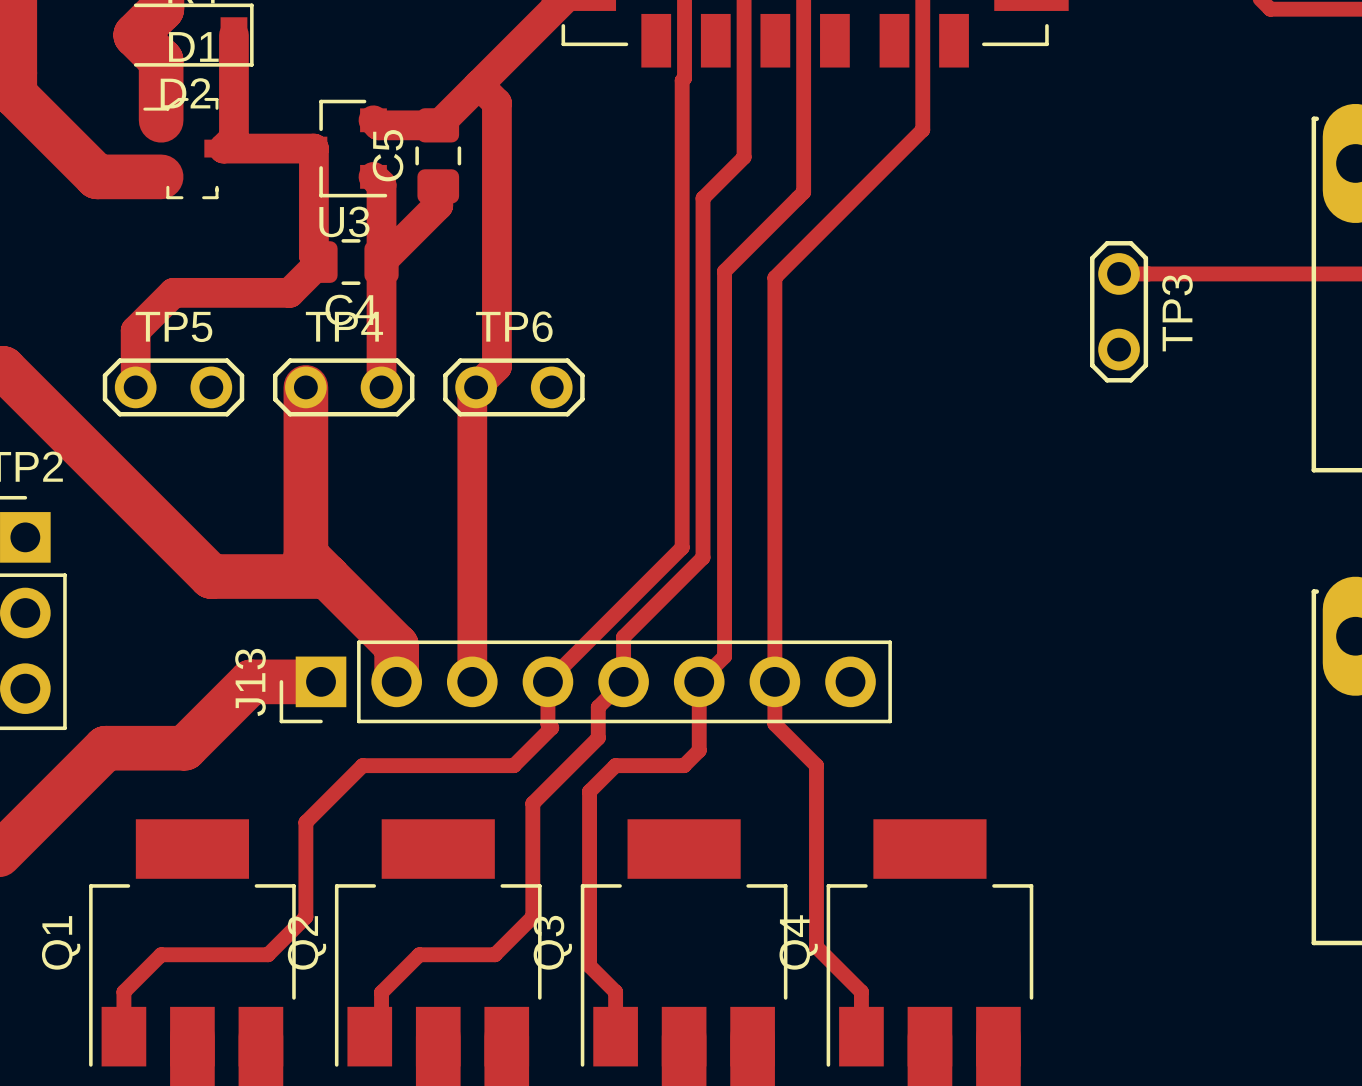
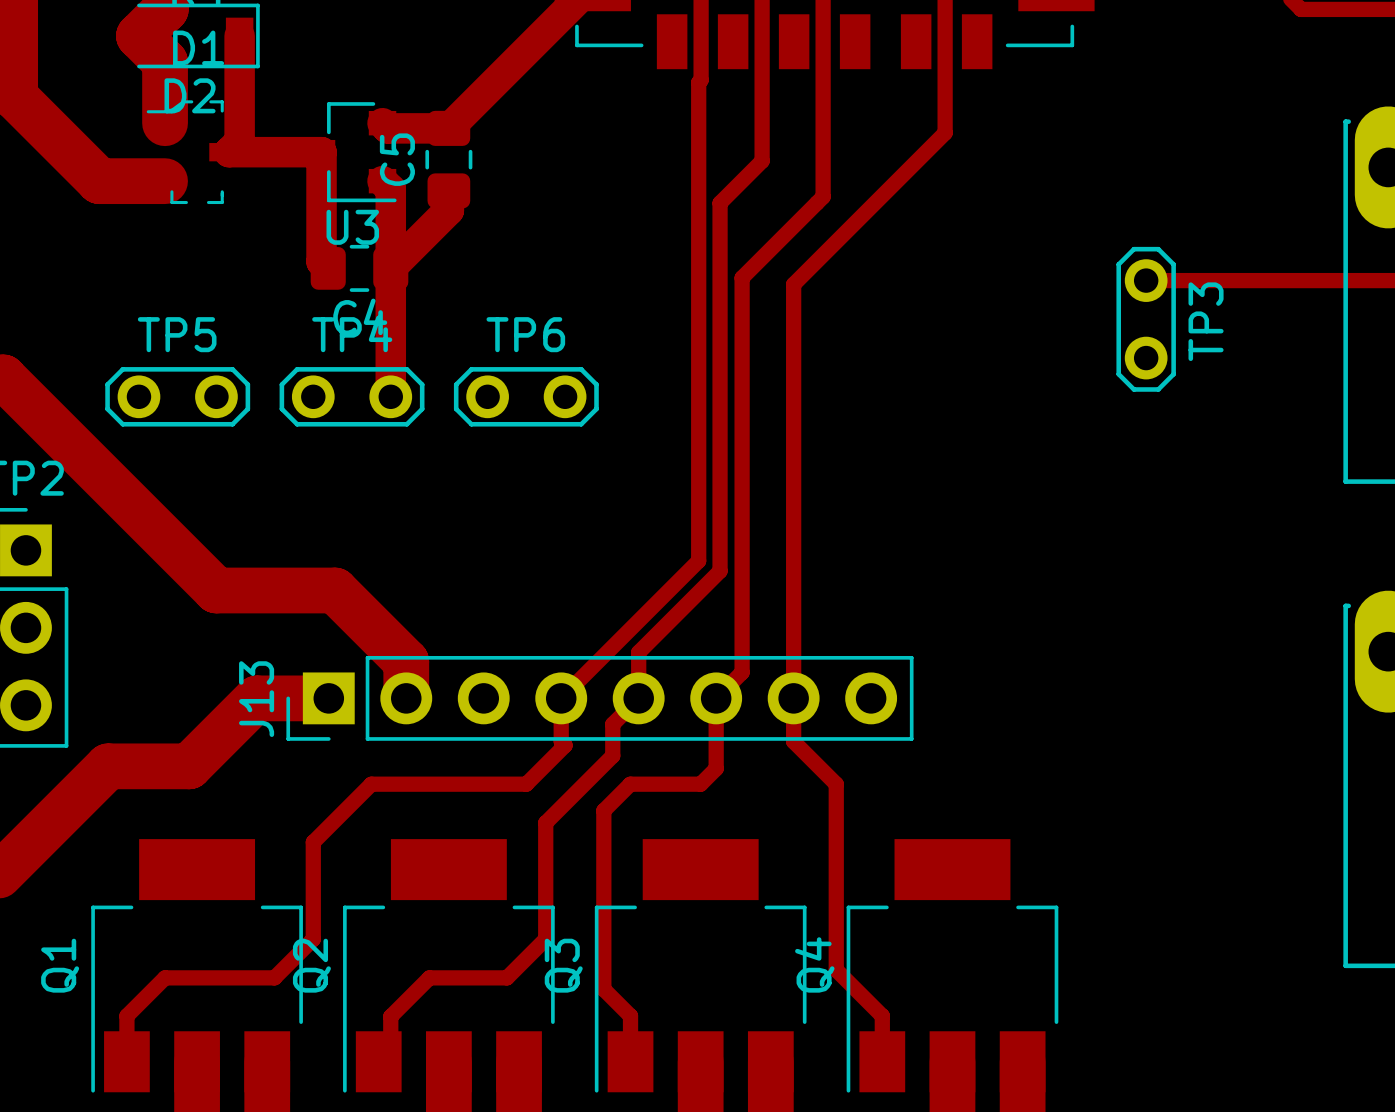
track: (478, 84) (496, 103) (496, 366) (472, 391) (472, 681) -> none
track: (320, 262) (289, 292) (173, 292) (135, 330) (135, 387) -> none
track: (305, 387) (305, 555) (327, 576) -> none

